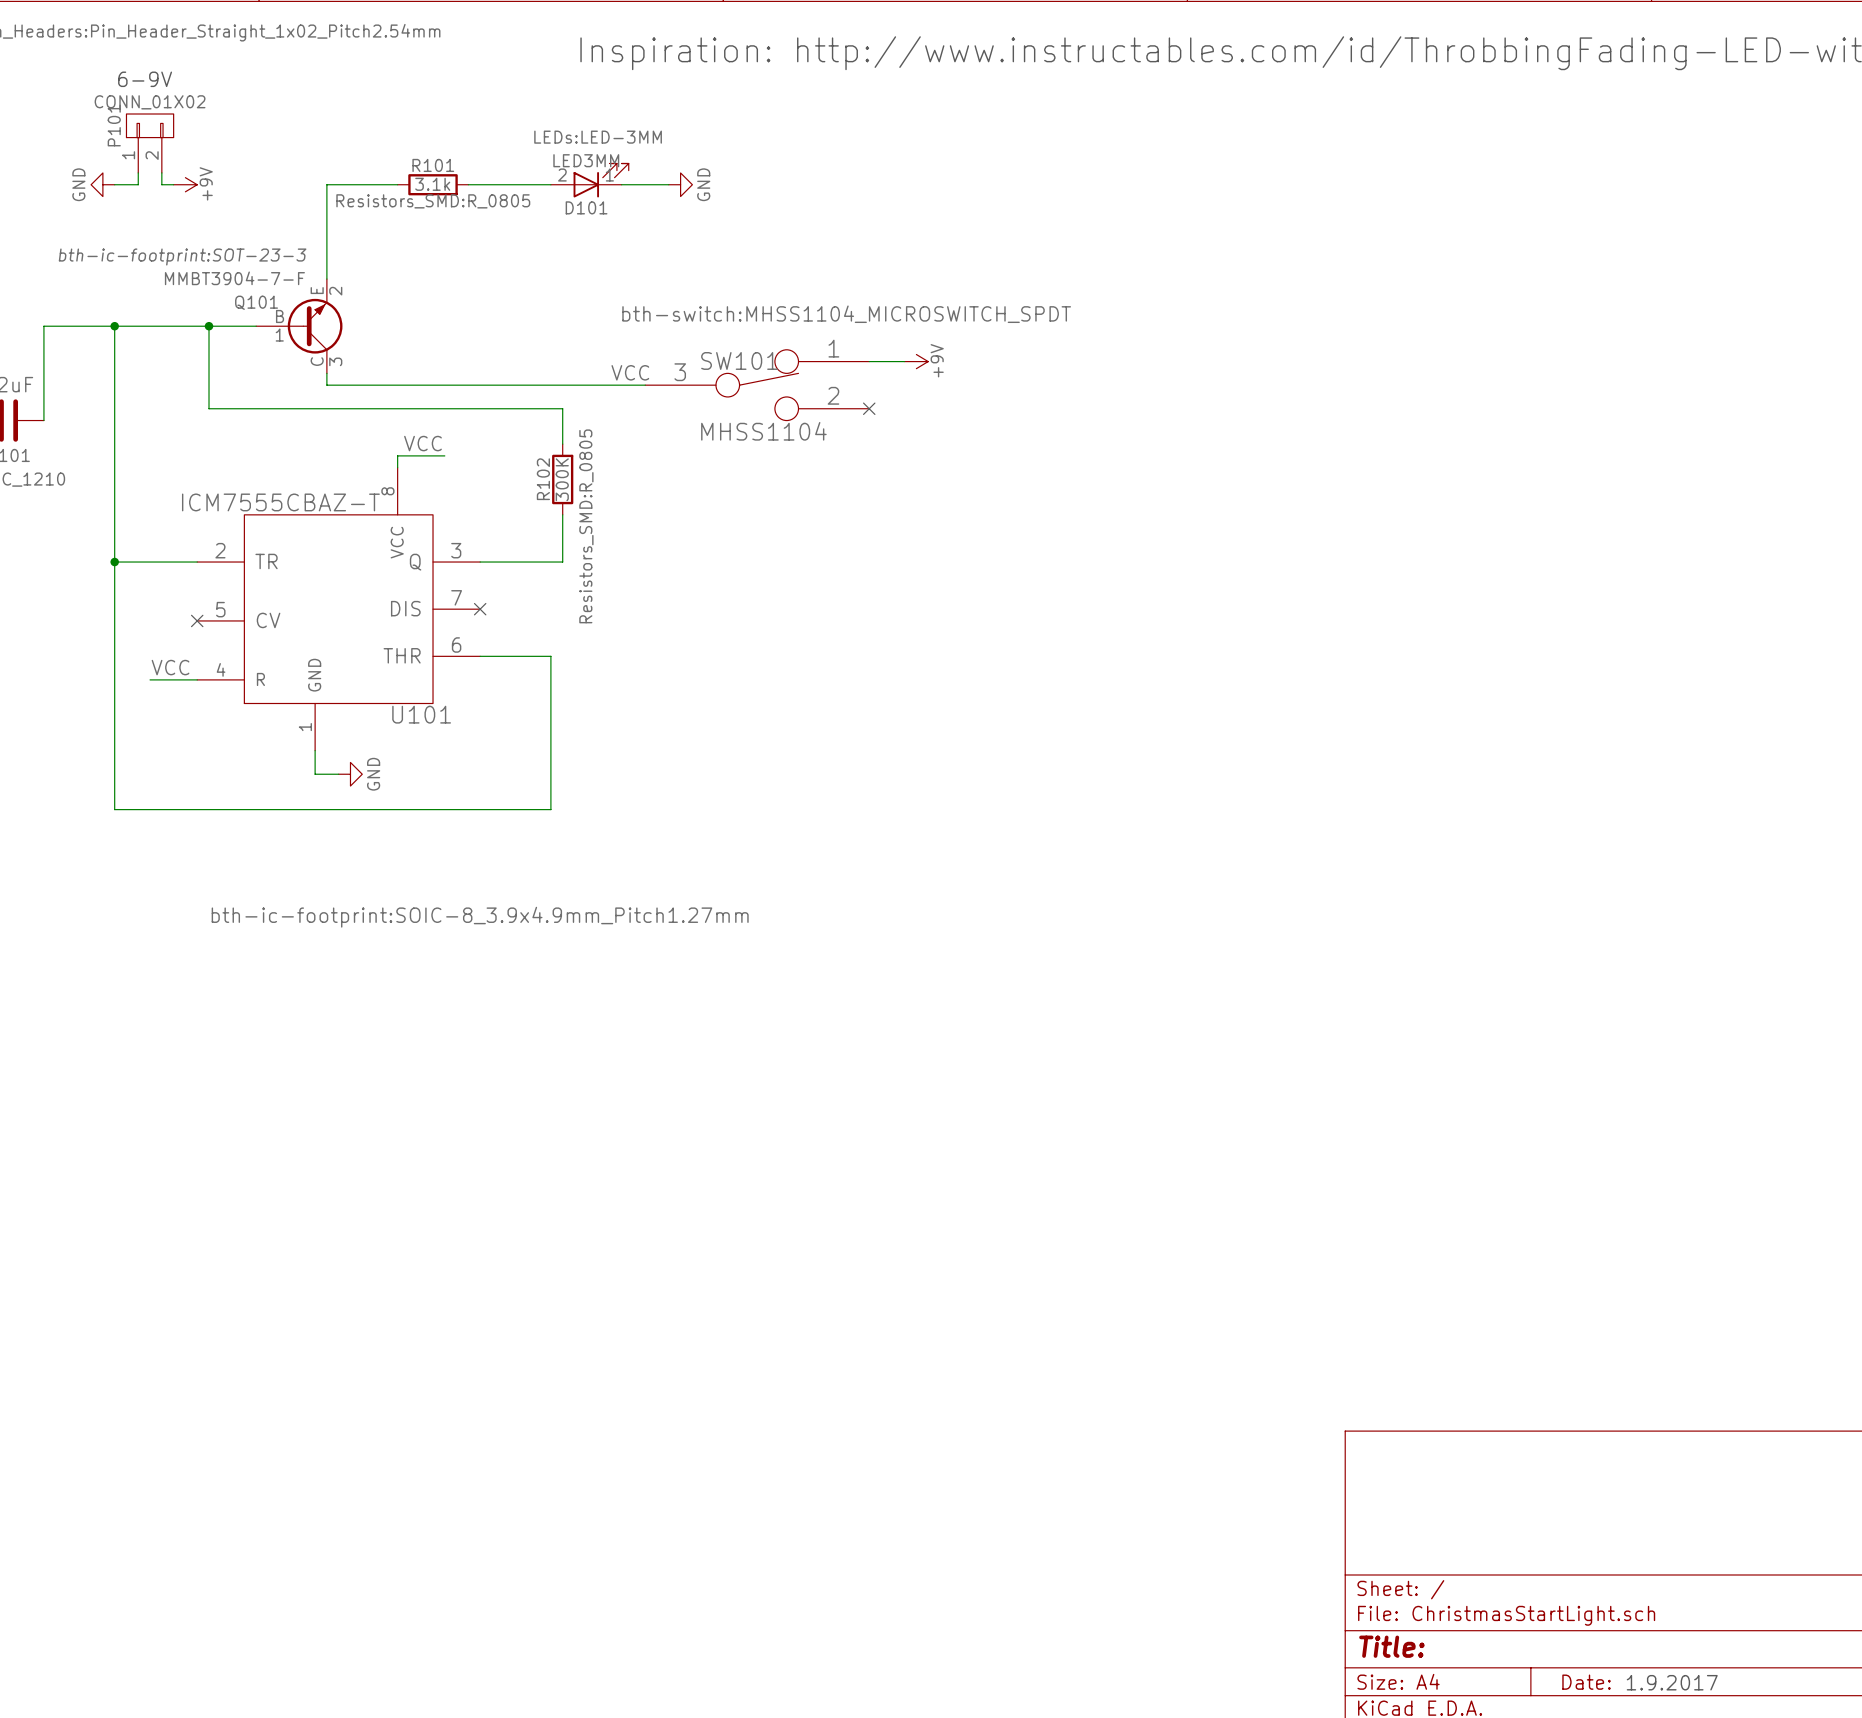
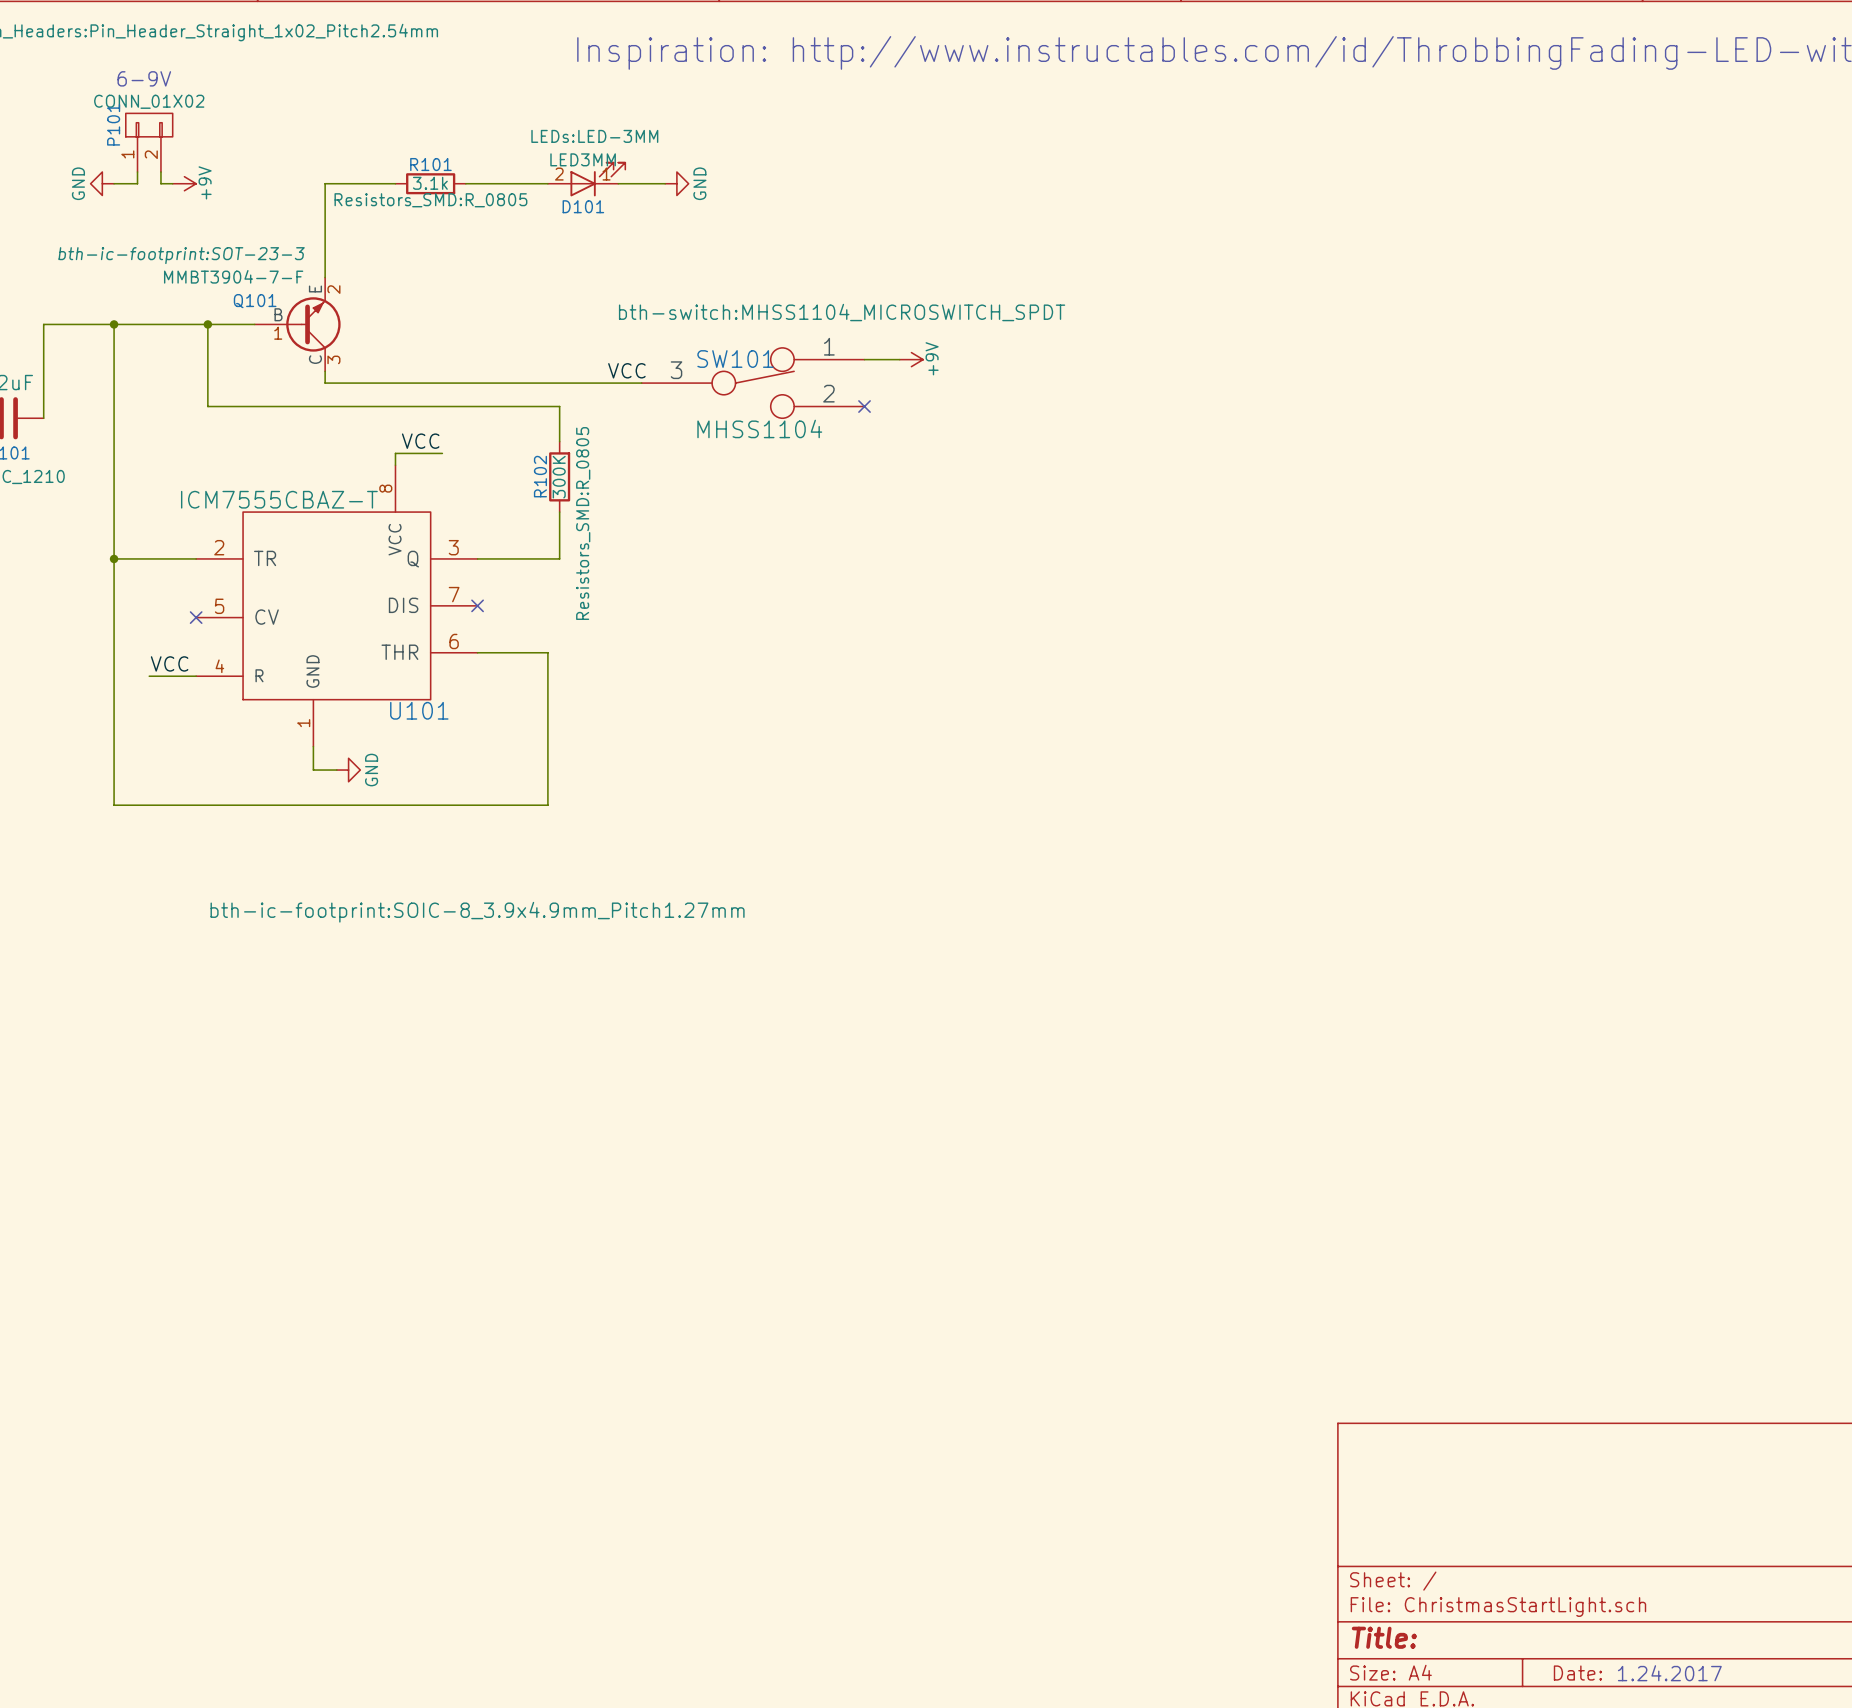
text: 1.9.2017 (1672, 1682) -> 1.24.2017 (1669, 1673)

